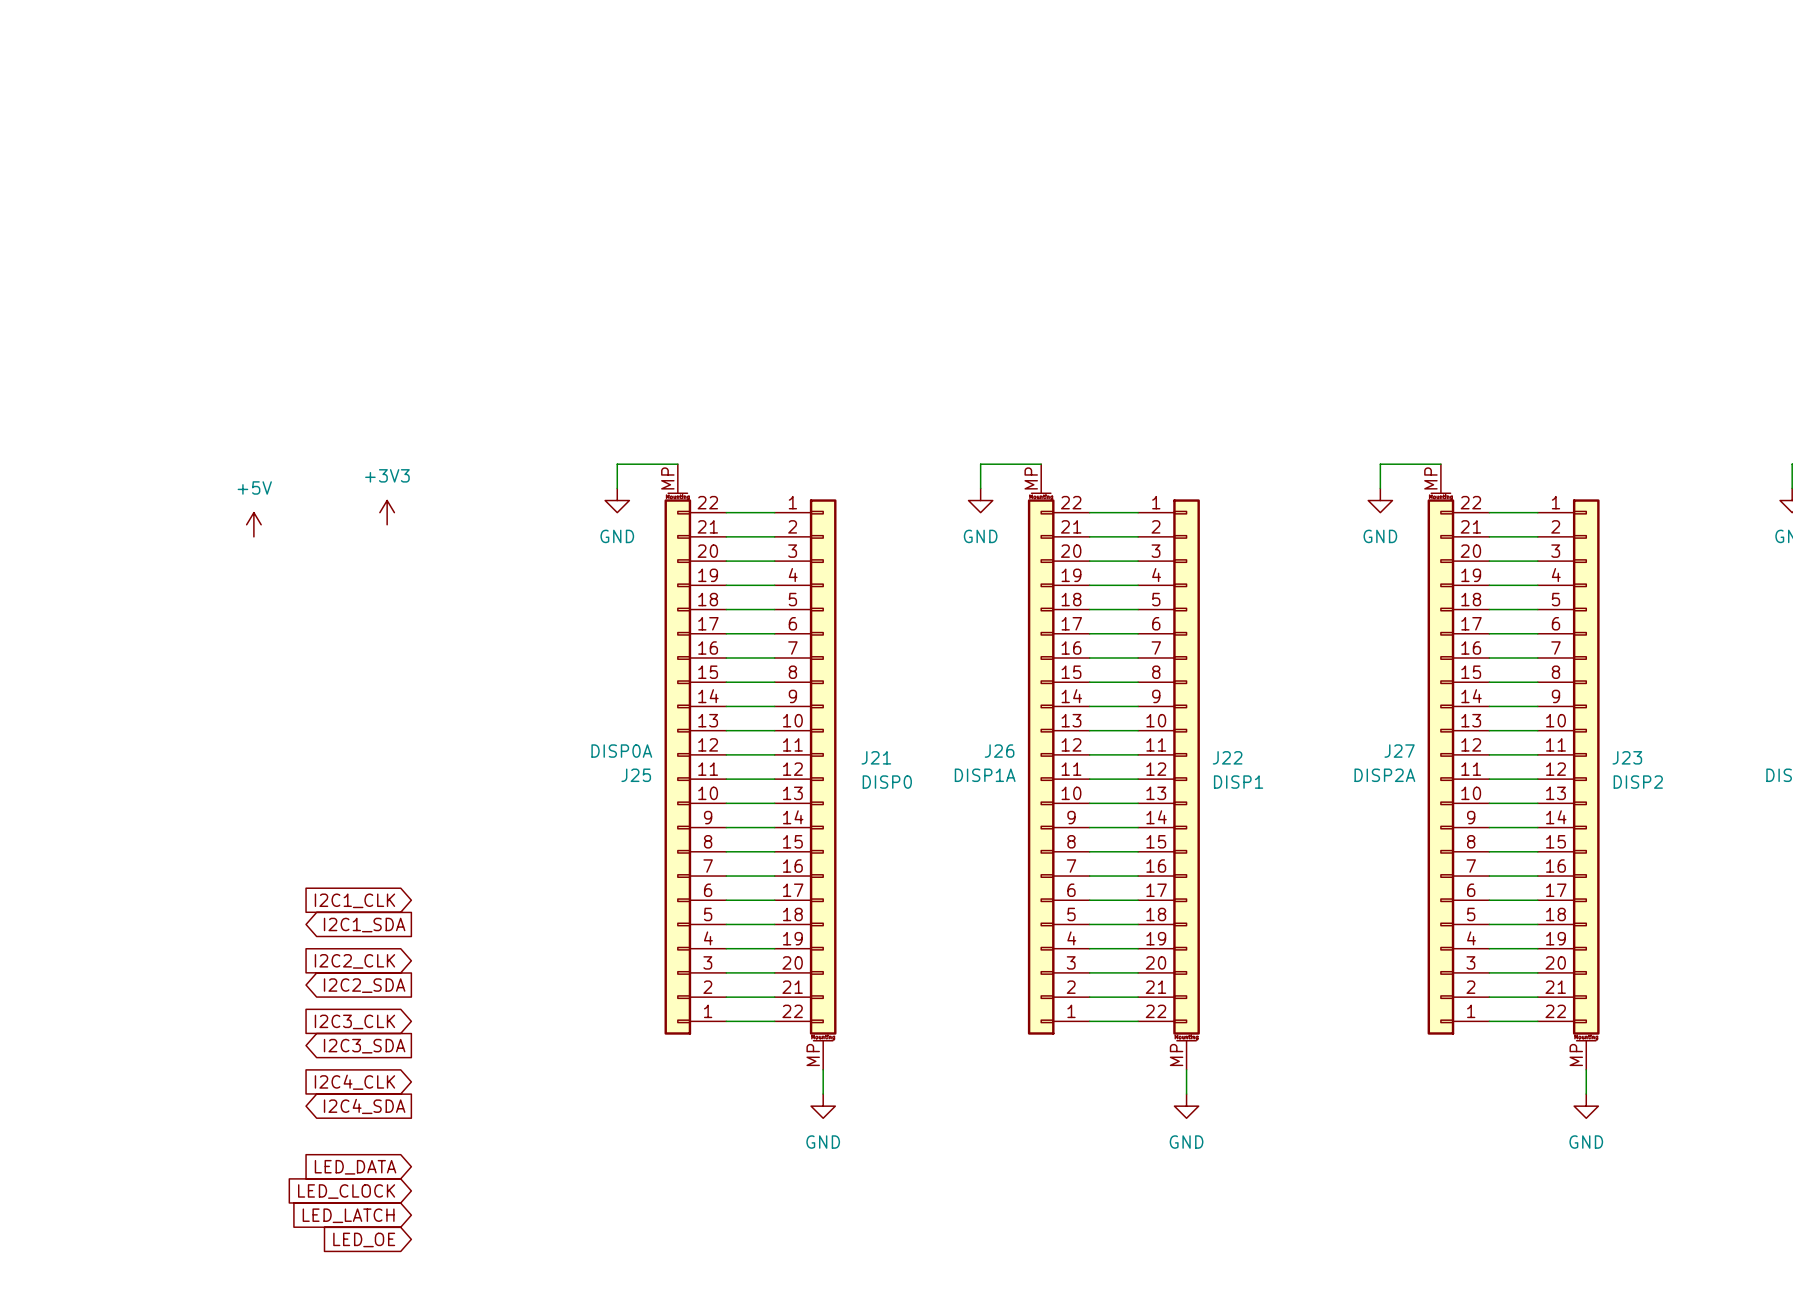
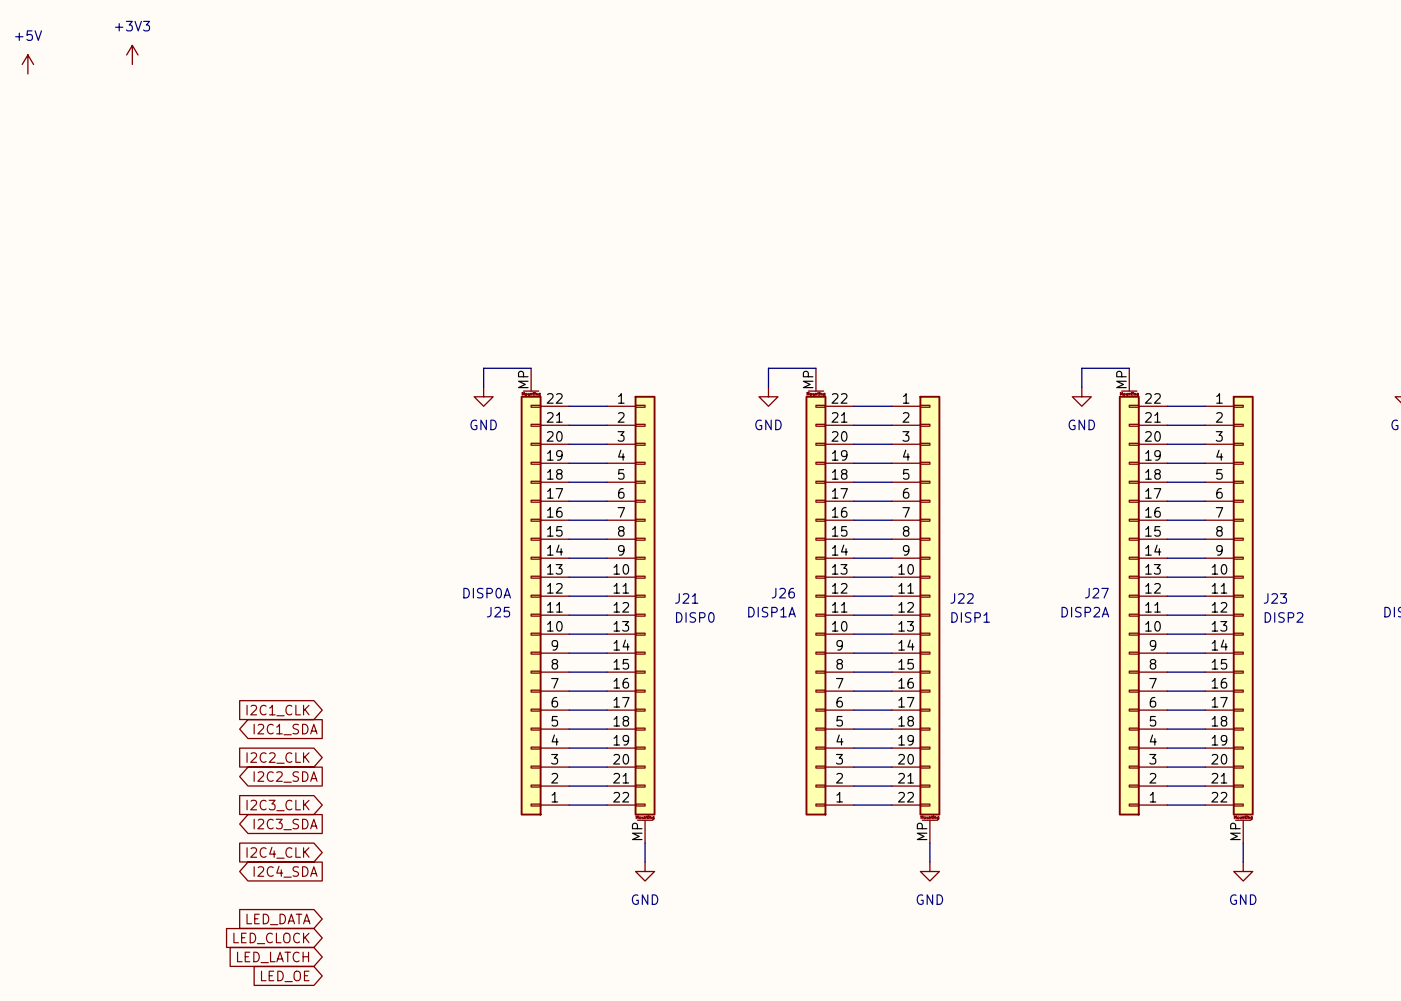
power symbol: none -> +3V3 (132, 54)
power symbol: none -> +5V (27, 64)
power symbol: +3V3 (387, 512) -> none
power symbol: +5V (253, 524) -> none

